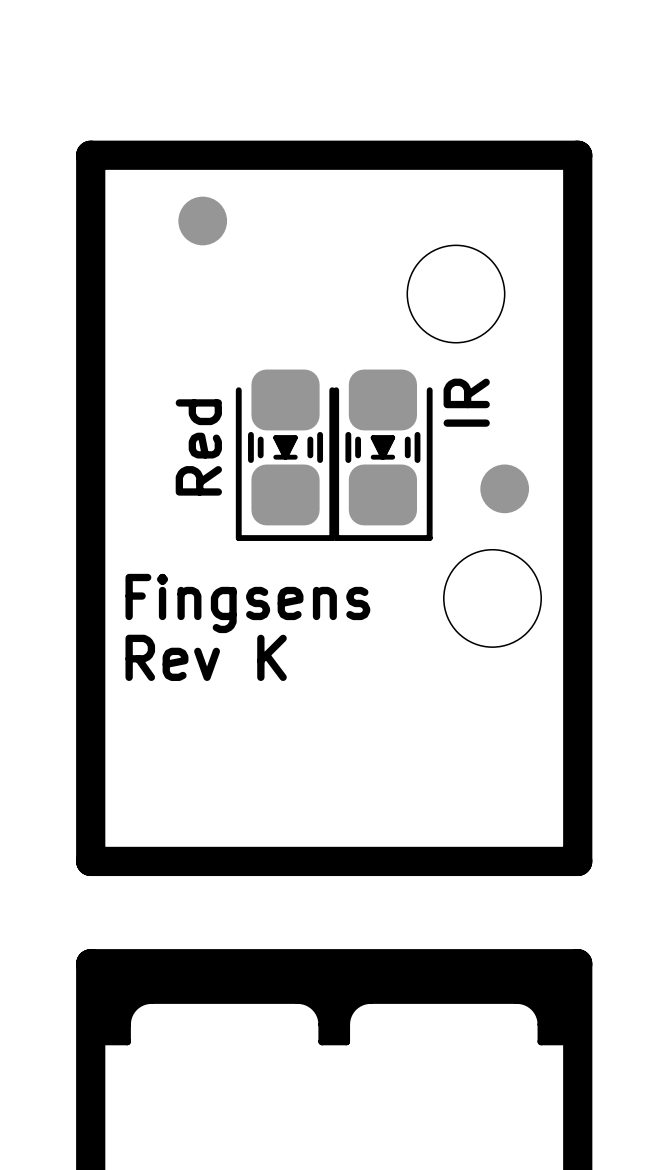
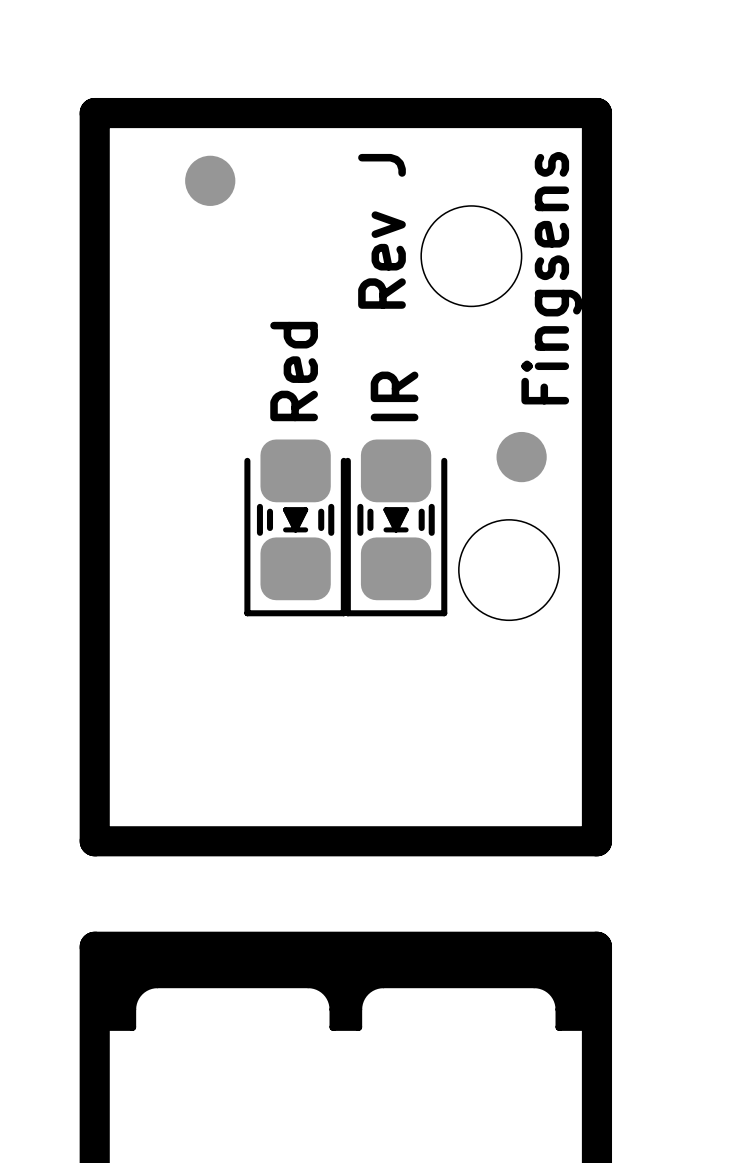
text: none -> Rev J (382, 231)
text position: IR (466, 402) -> IR (394, 396)
text position: Red (198, 447) -> Red (294, 371)
part: (285, 455) -> none
part: (382, 455) -> none
part: none -> (295, 527)
part: none -> (396, 527)
text rotation: 0° (247, 603) -> 90° counterclockwise (551, 278)
text position: Fingsens (247, 603) -> Fingsens (551, 278)
text: Rev K (206, 657) -> none

